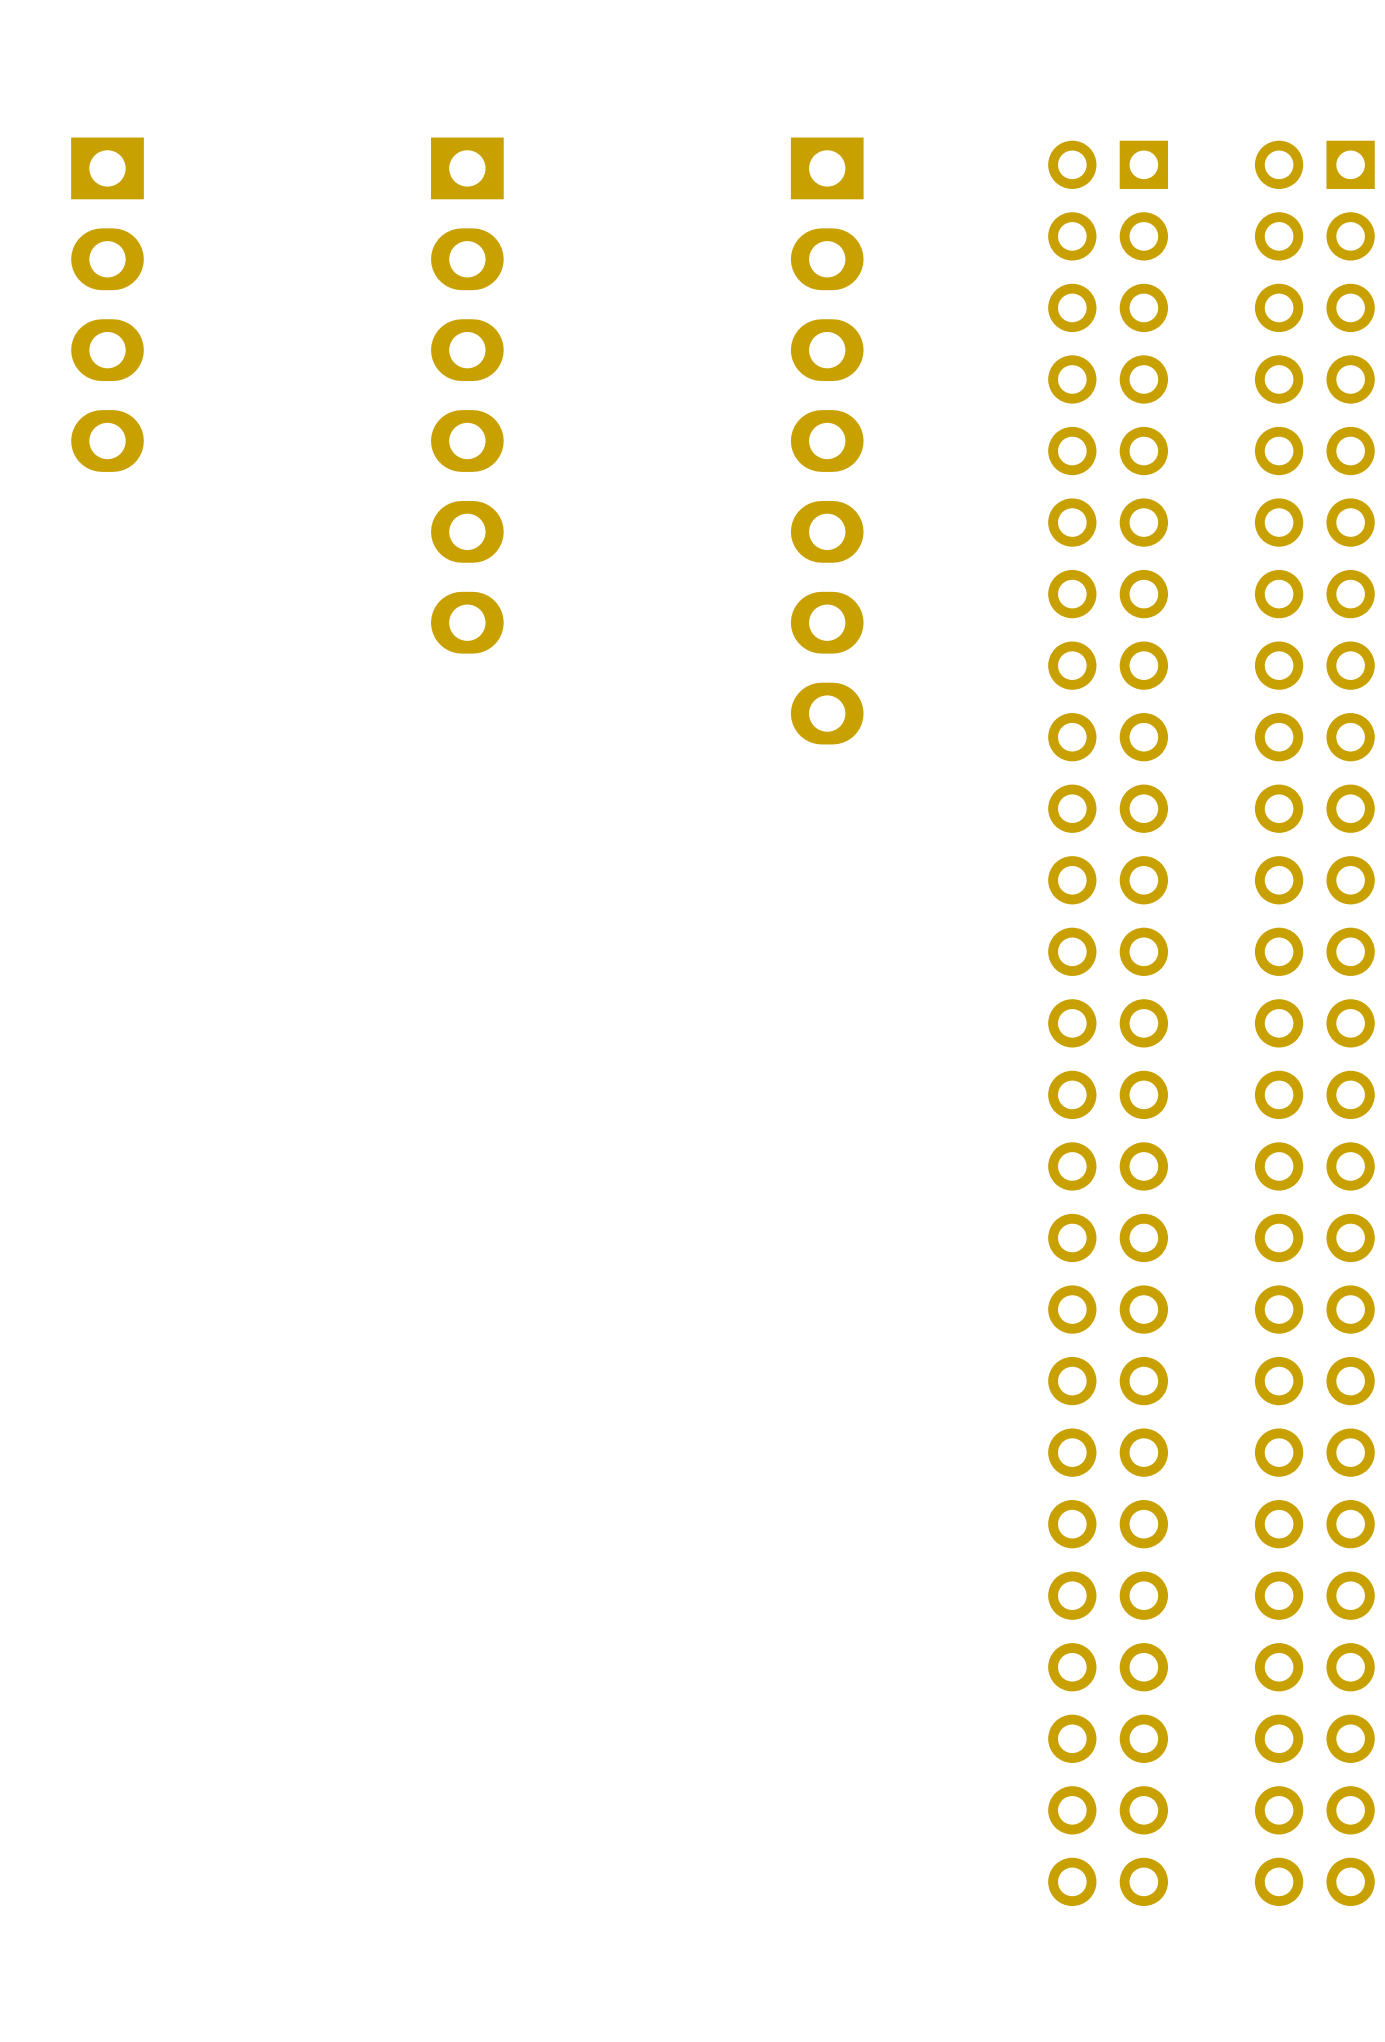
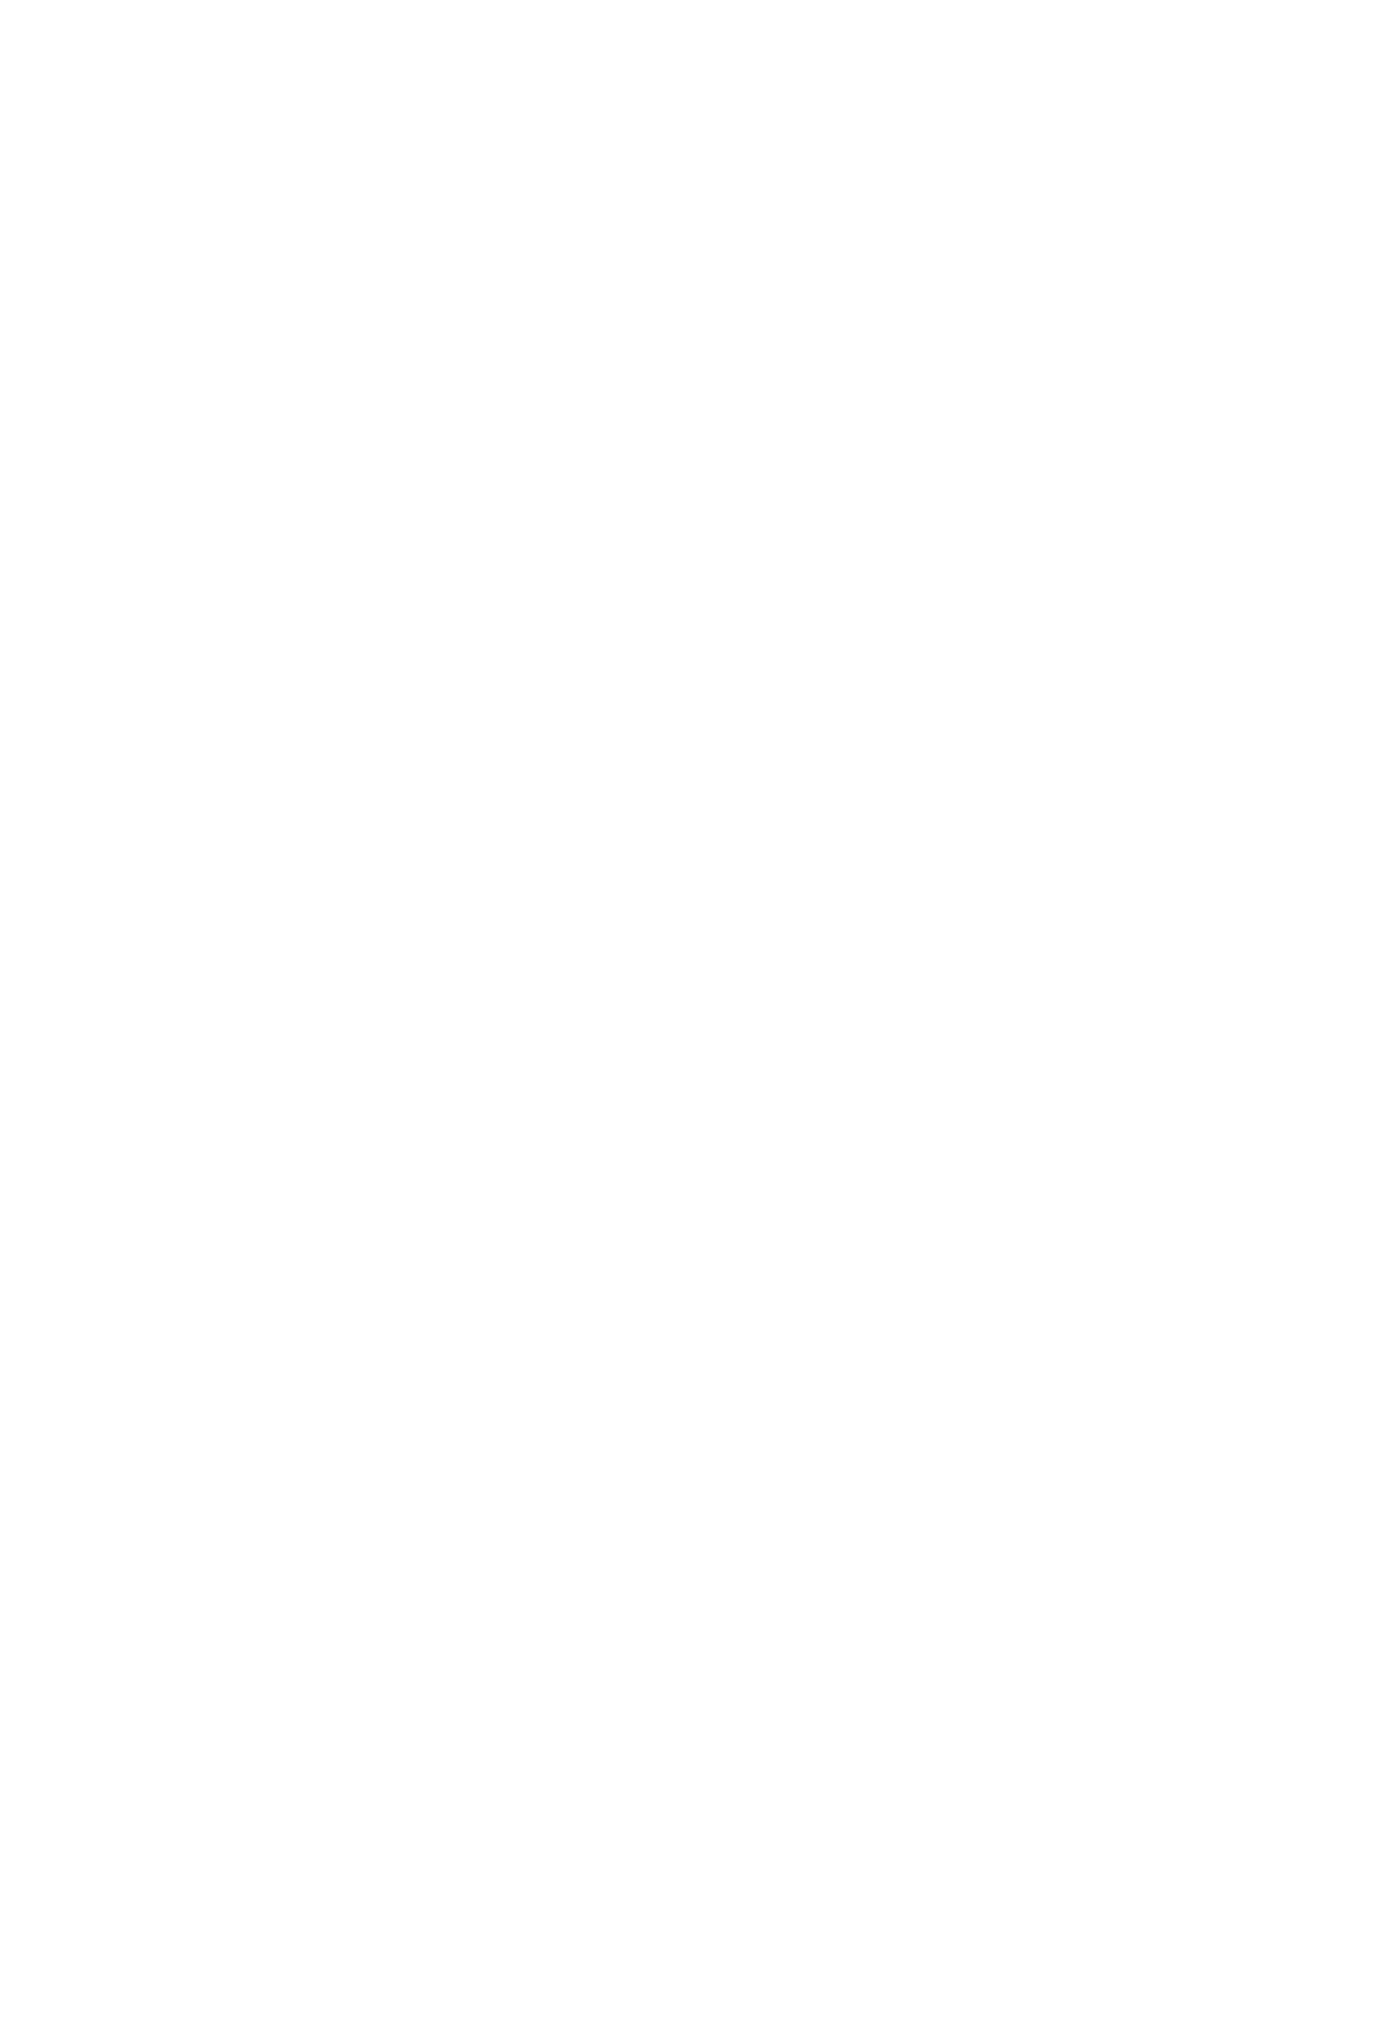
part: (107, 304) -> none
part: (467, 395) -> none
part: (827, 441) -> none
part: (1108, 1023) -> none
part: (1314, 1023) -> none

